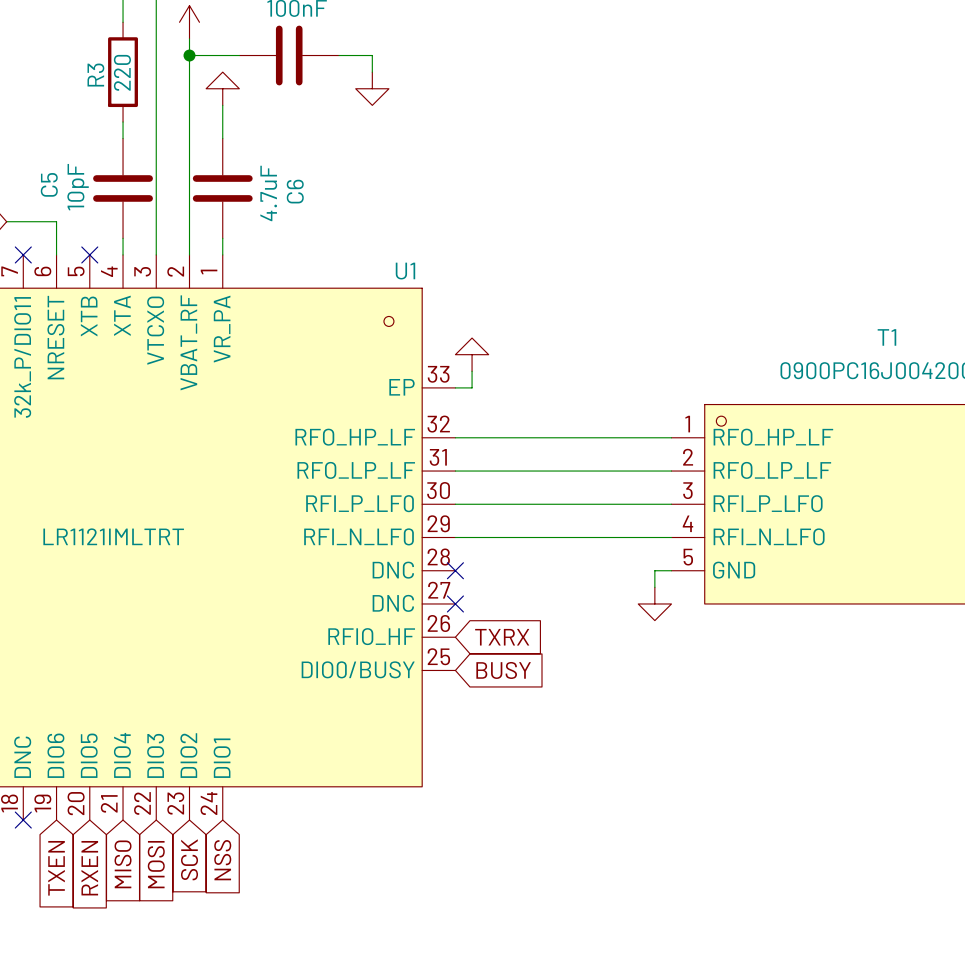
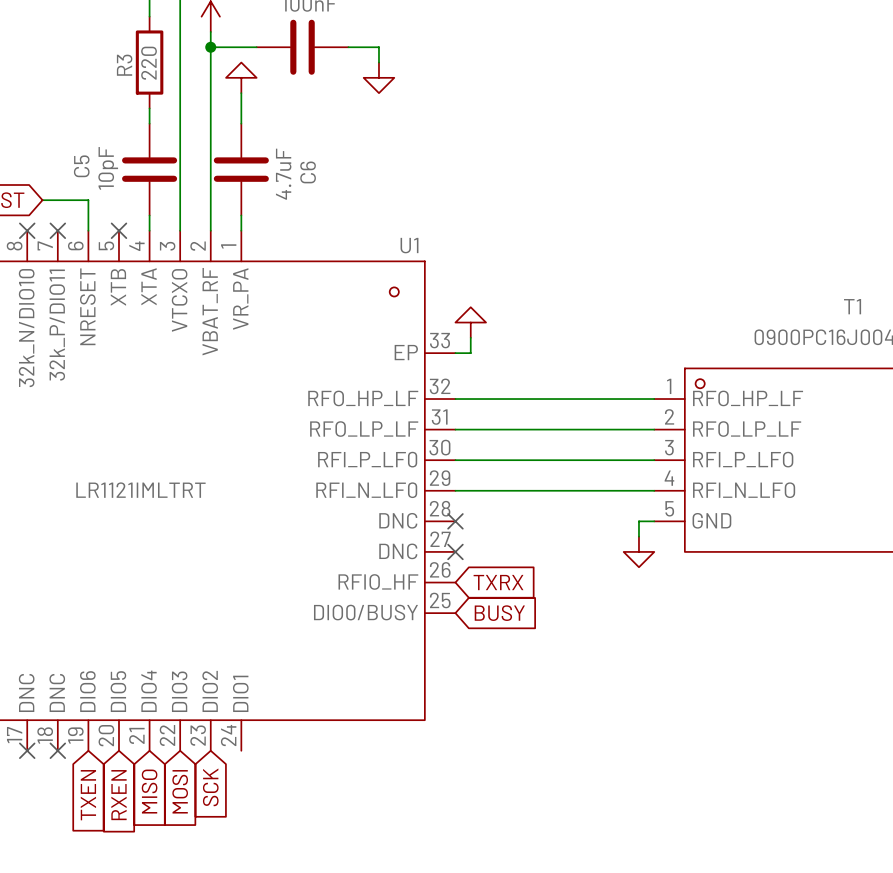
global label: NSS (222, 860) -> none

